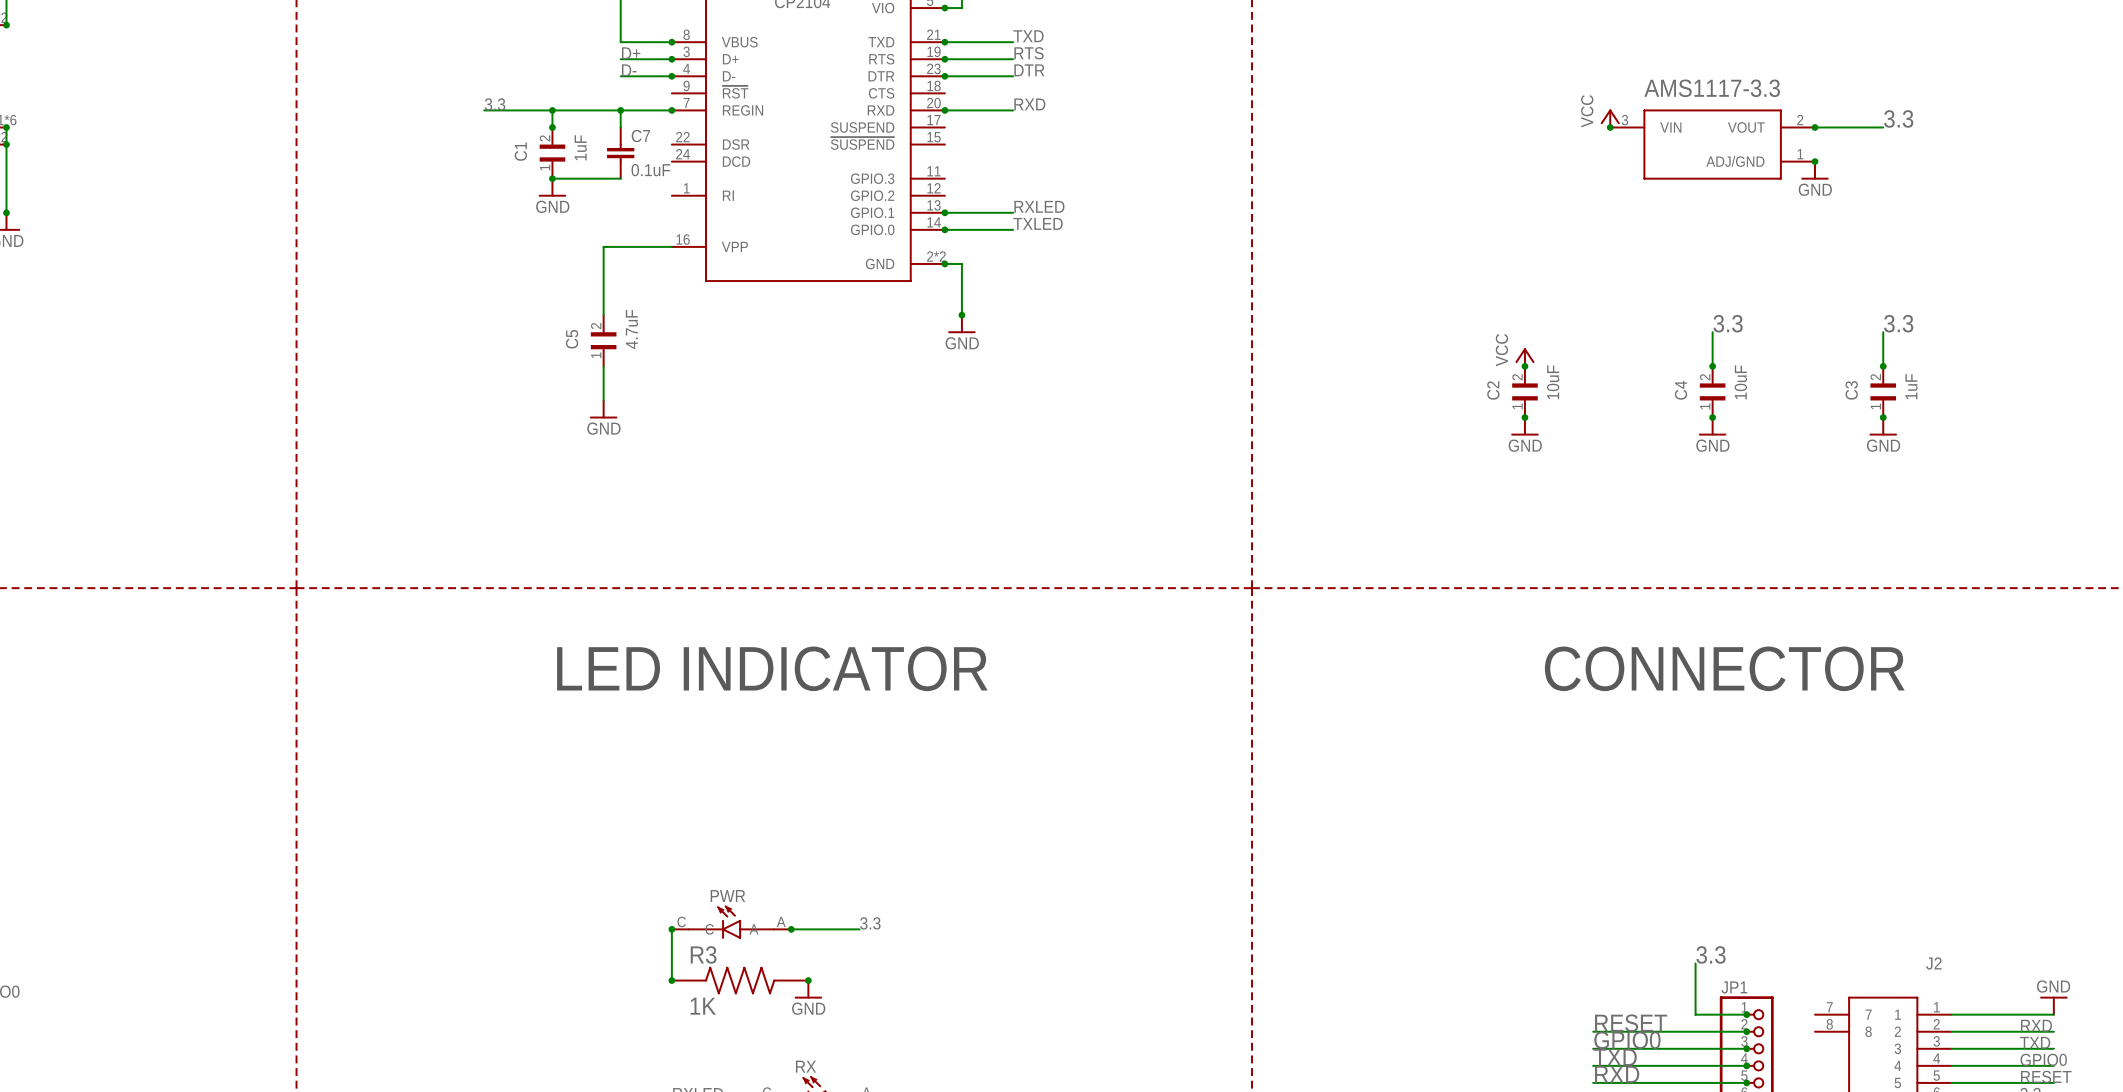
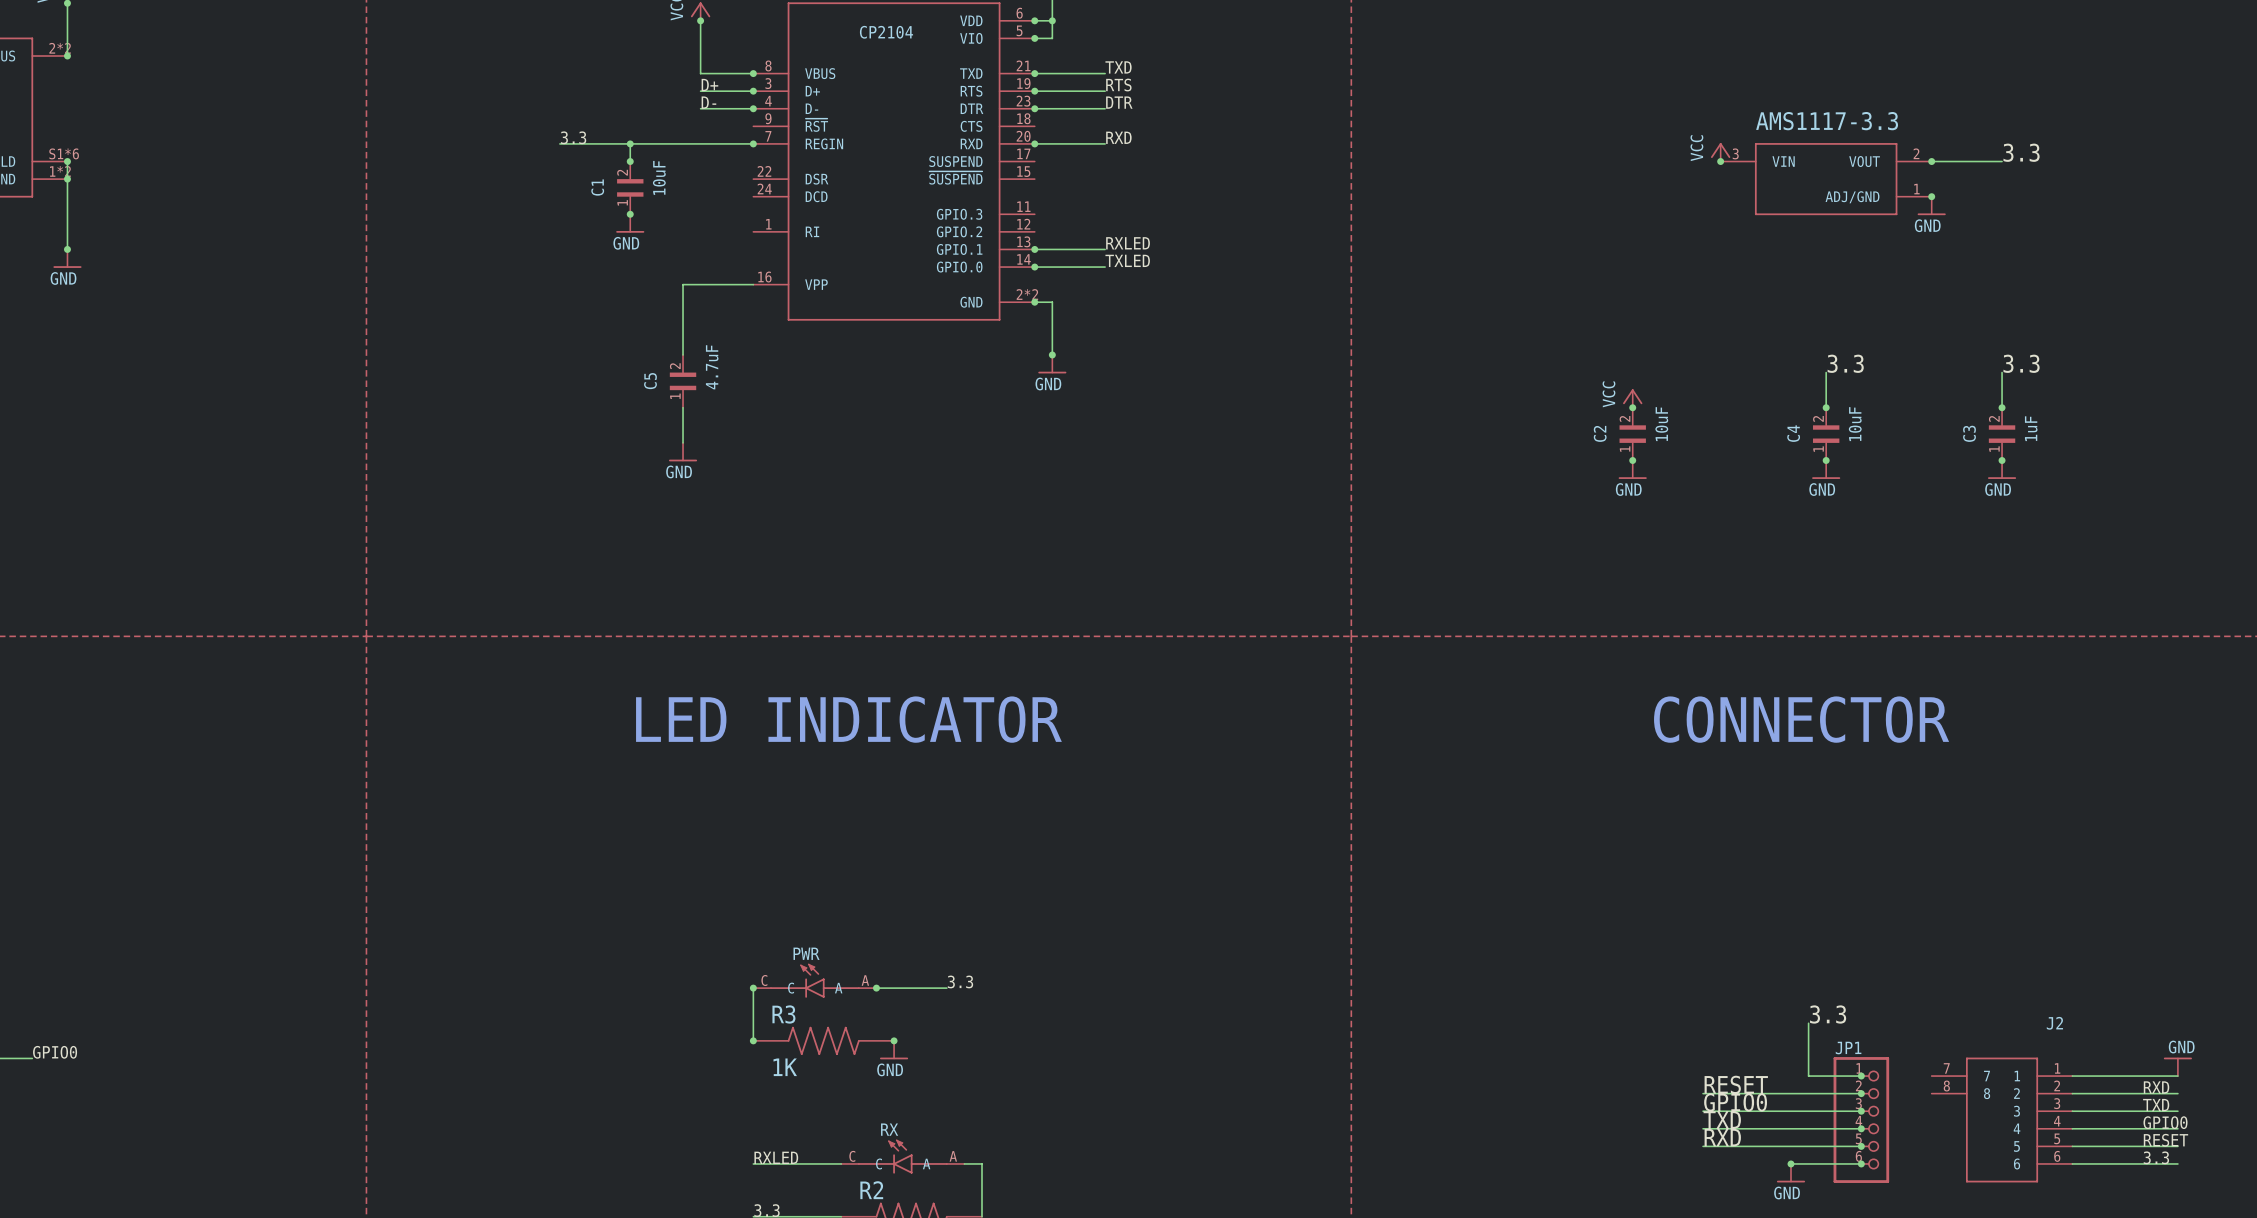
wire: (620, 110) (620, 127) -> none
junction: (620, 110) -> none
C1 value: 1uF (580, 147) -> 10uF (659, 177)
C7: 0.1uF (620, 153) -> none
wire: (552, 178) (620, 178) -> none

